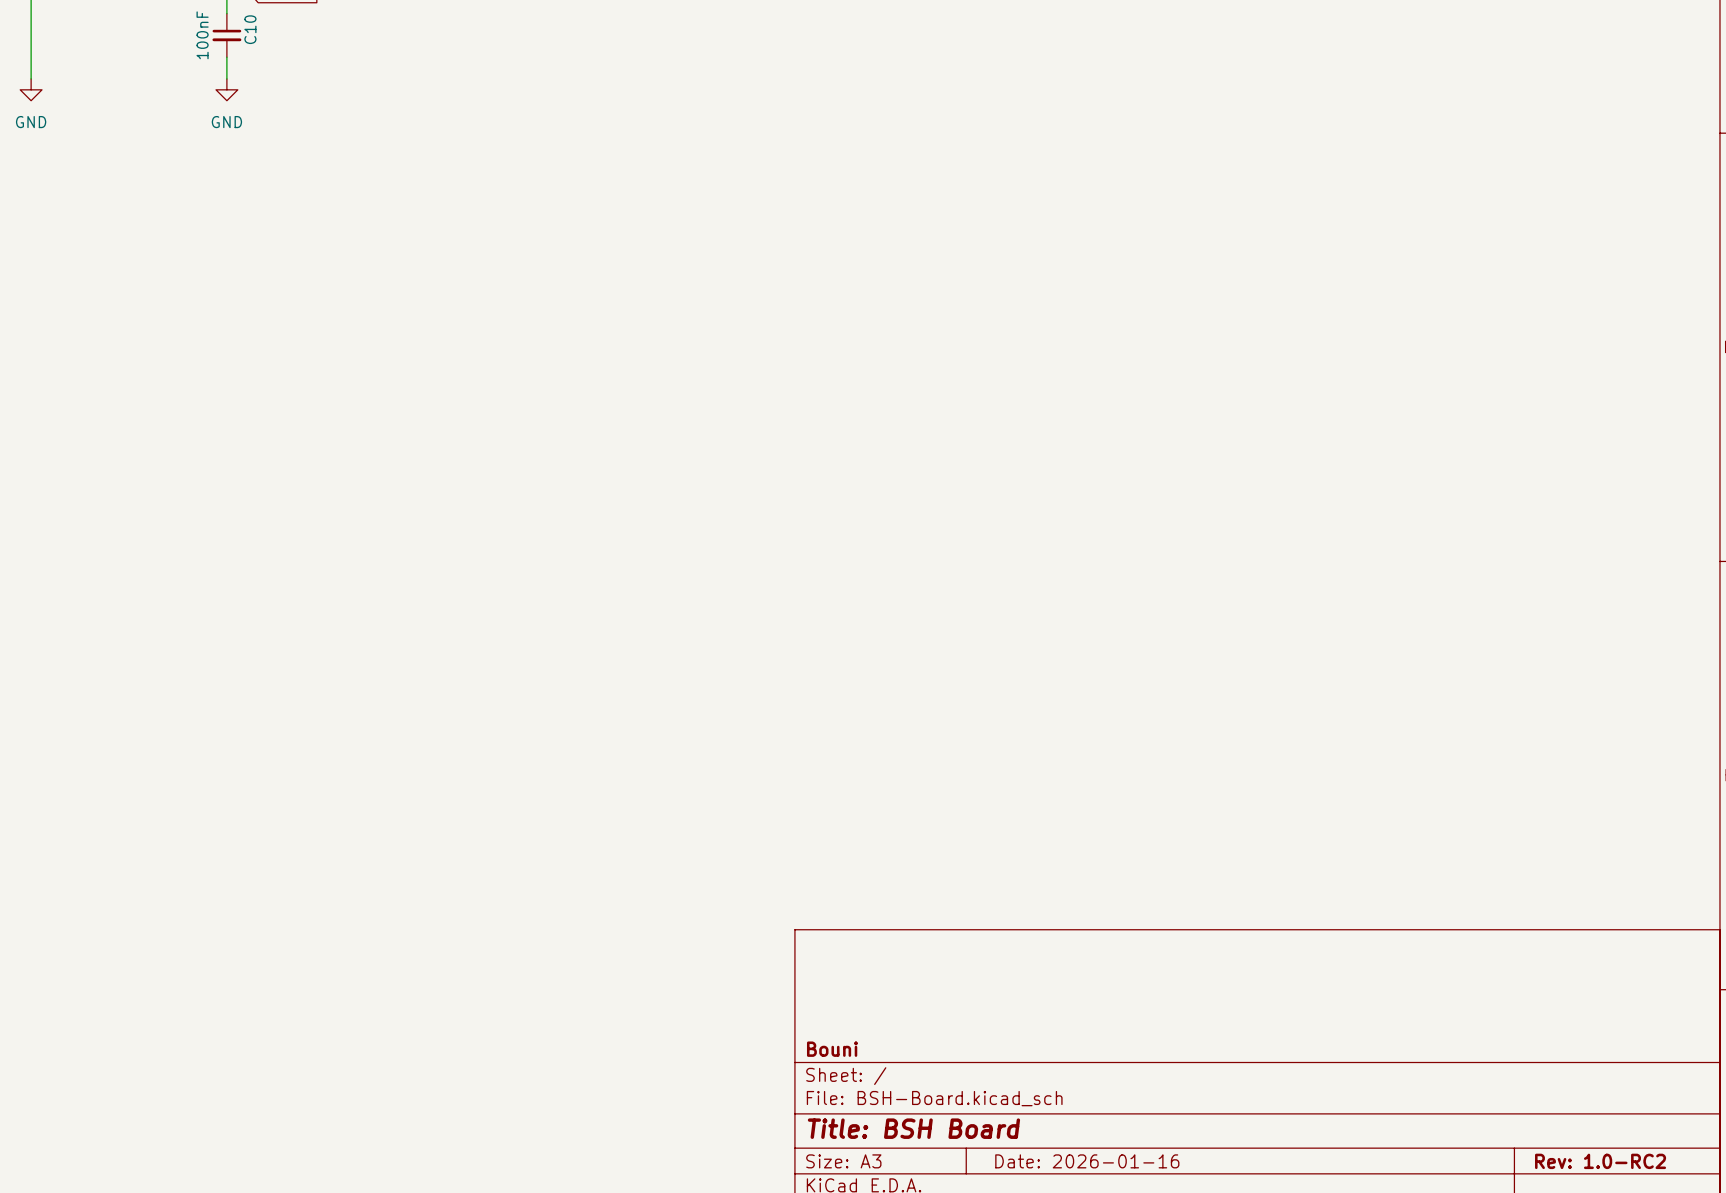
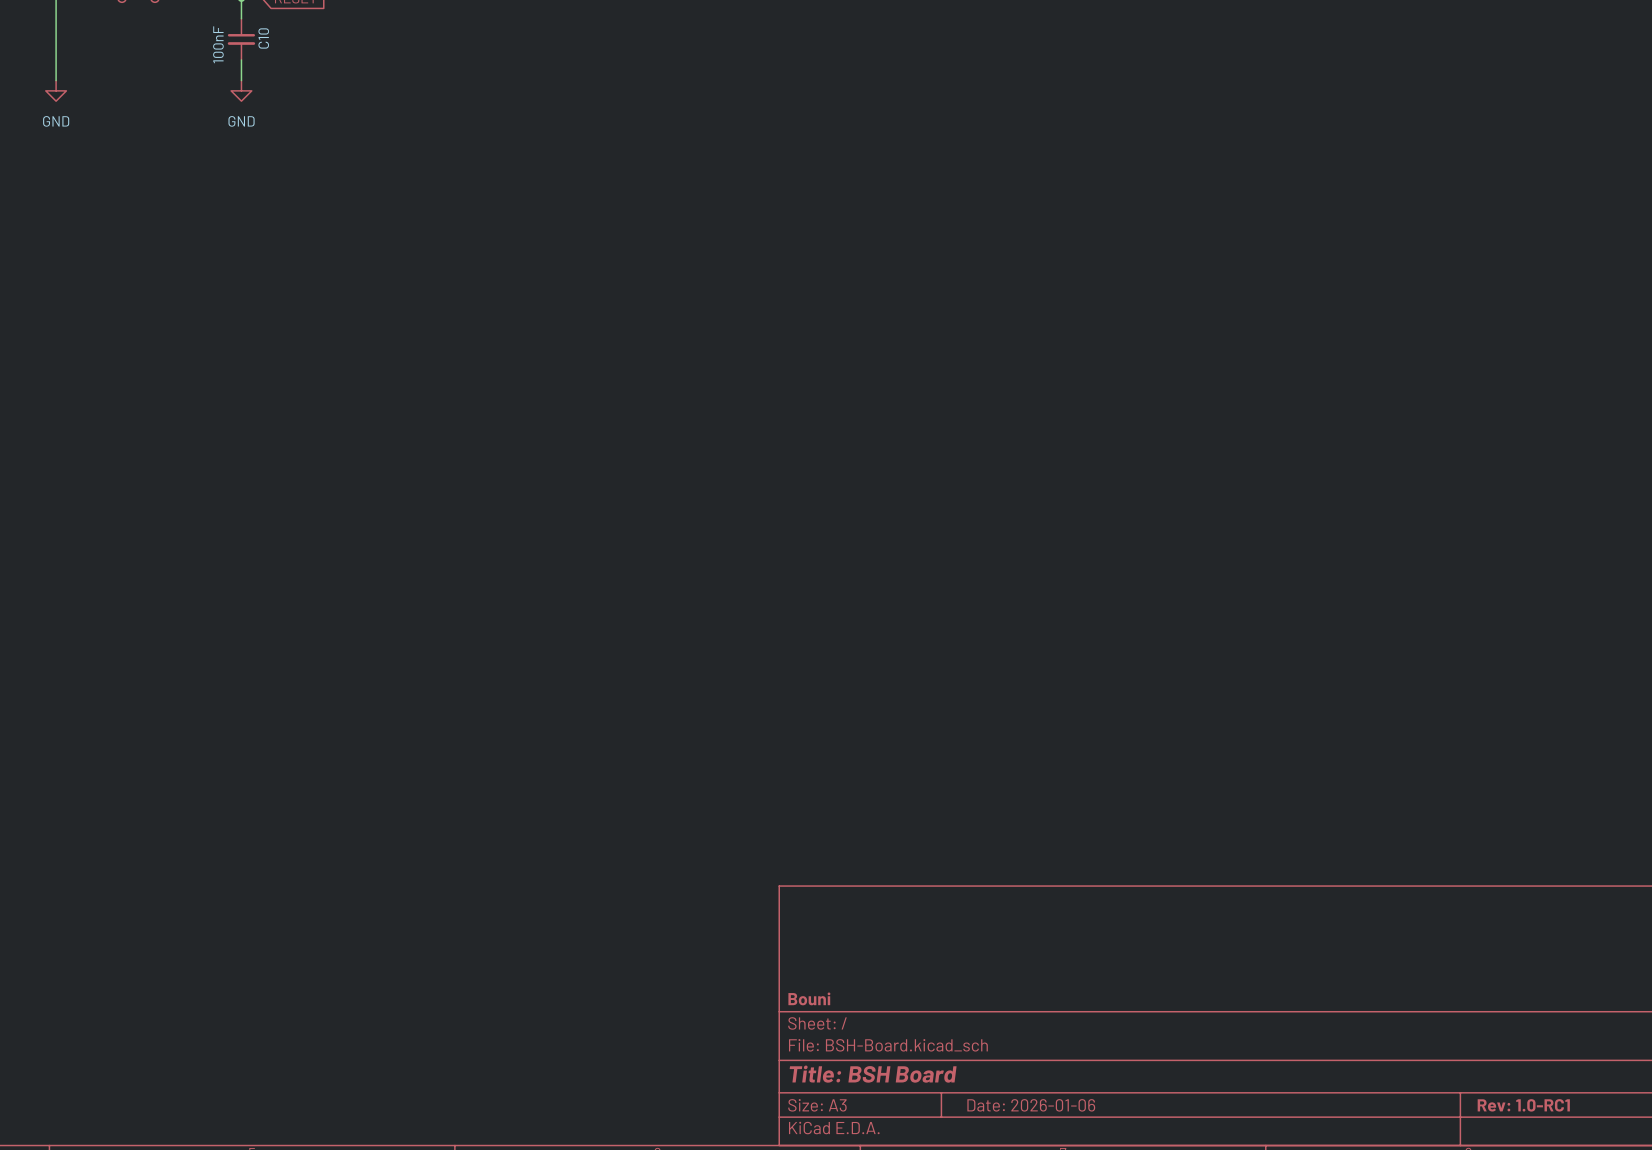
title block: Date: 2026-01-16 (1087, 1161) -> Date: 2026-01-06 (1031, 1105)
title block: Rev: 1.0-RC2 (1600, 1161) -> Rev: 1.0-RC1 (1523, 1105)

